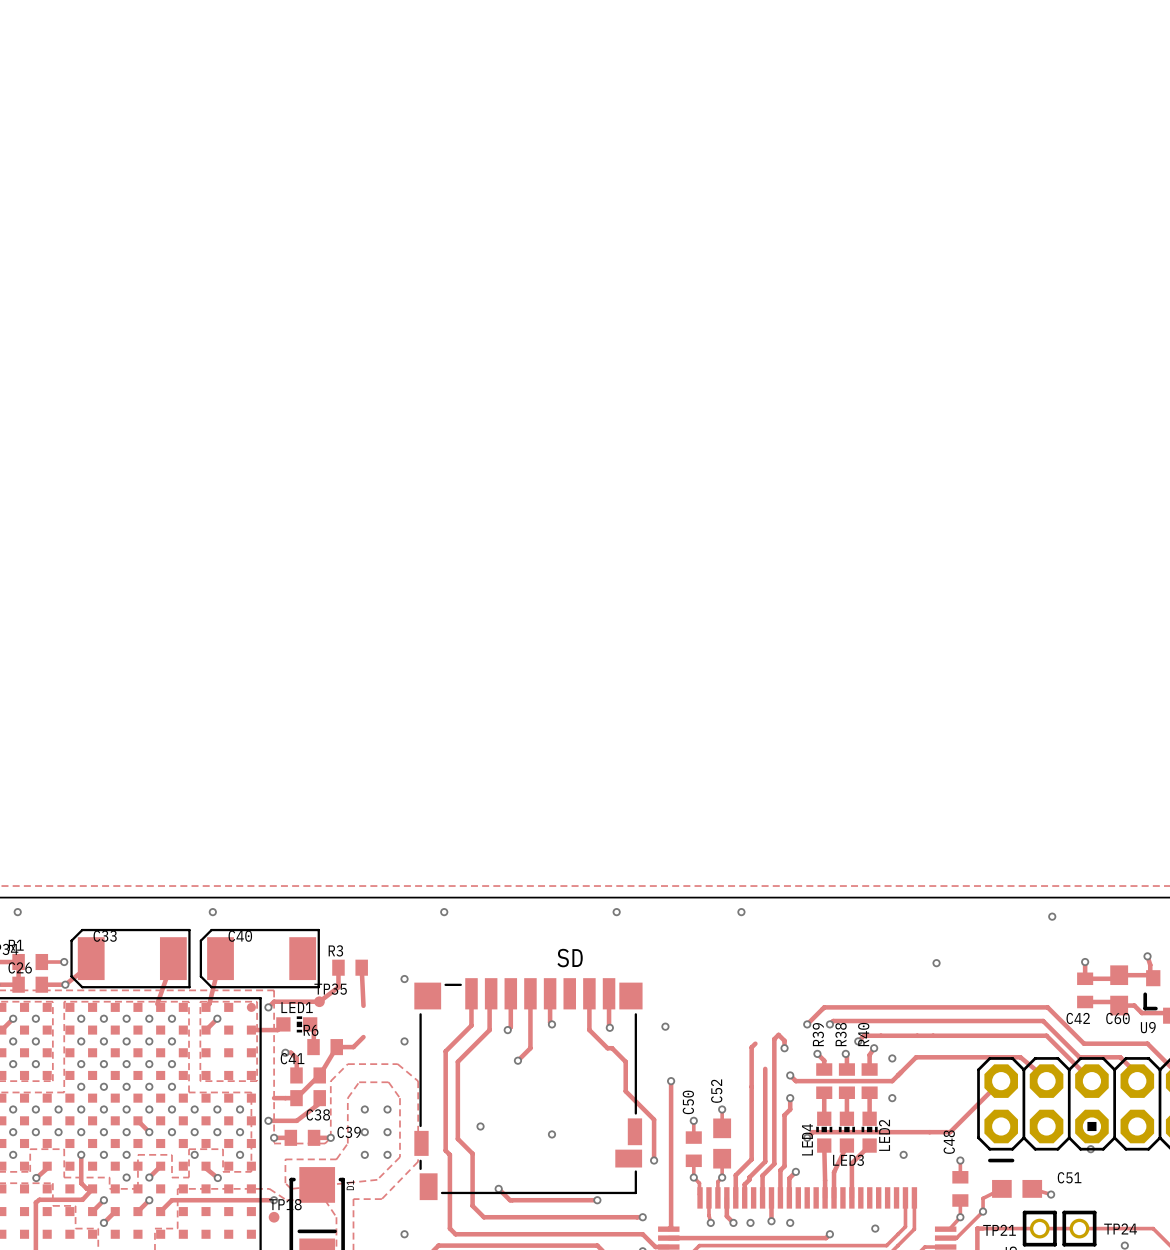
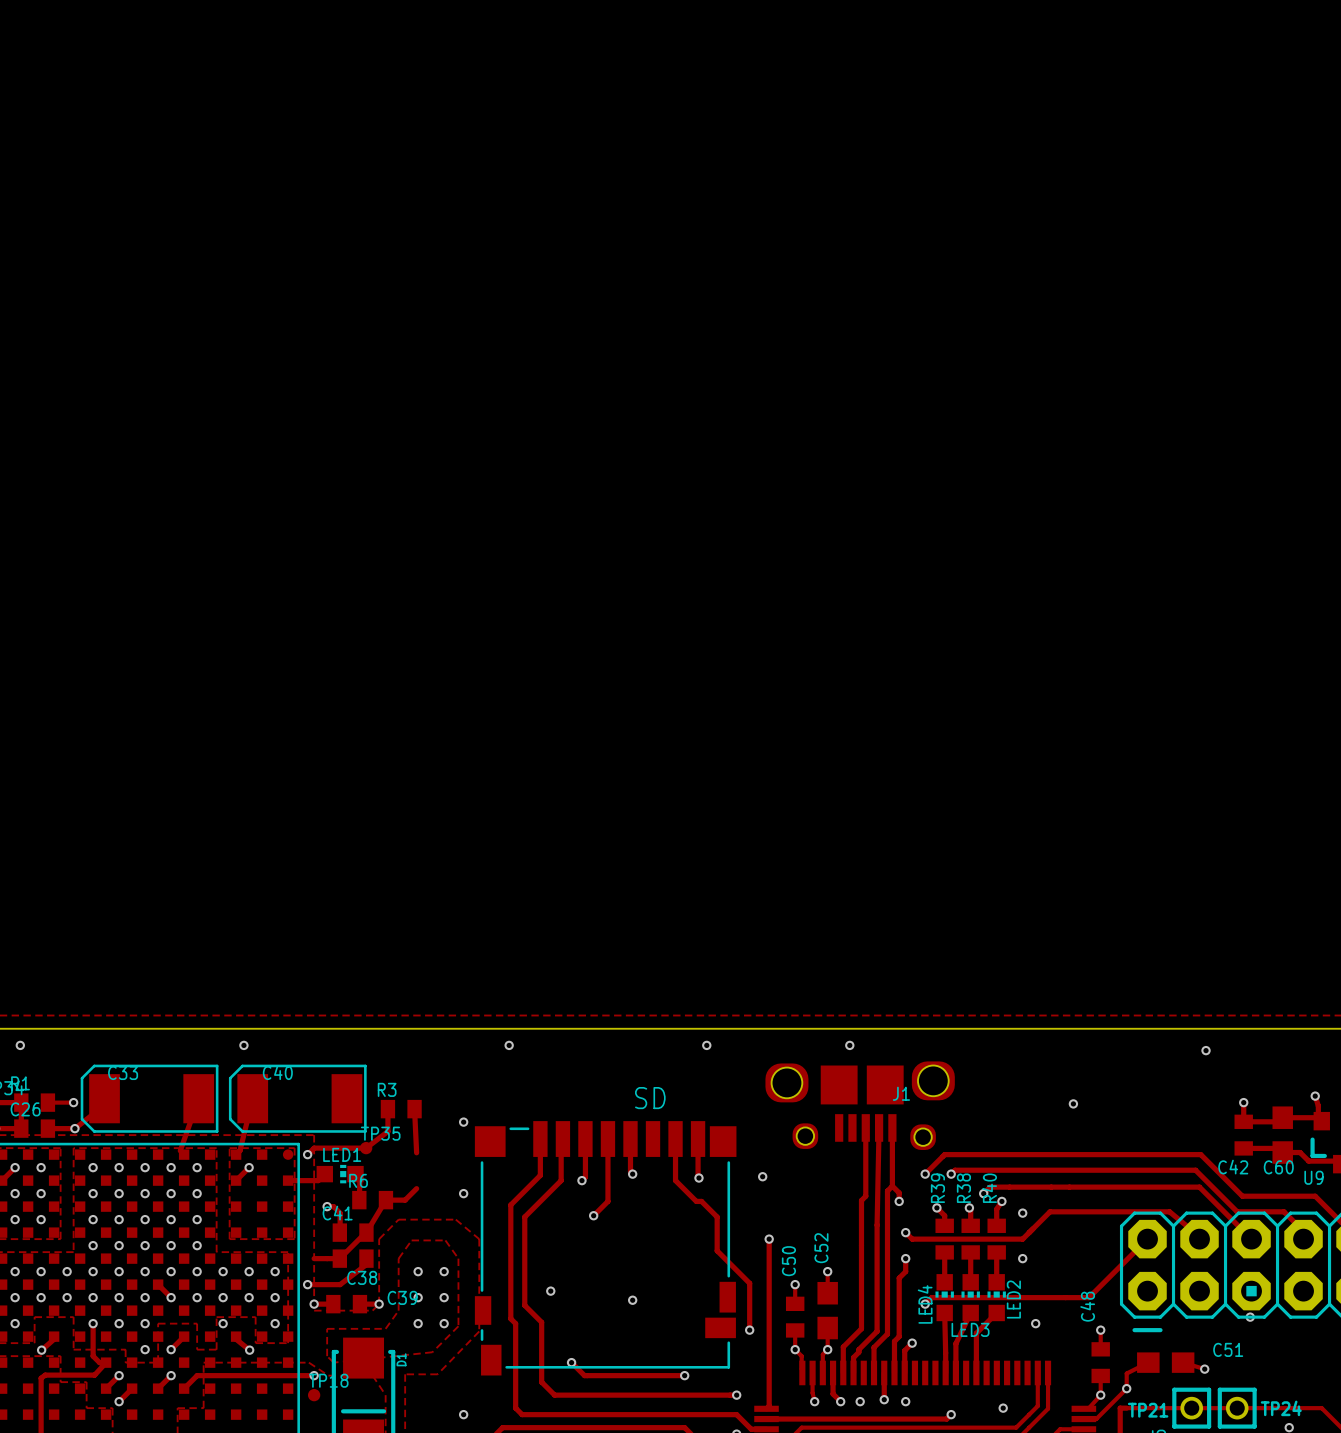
J1: none -> (860, 1105)
track: none -> (865, 1127) (865, 1196)
track: none -> (879, 1127) (877, 1225)
track: none -> (892, 1127) (892, 1186)

